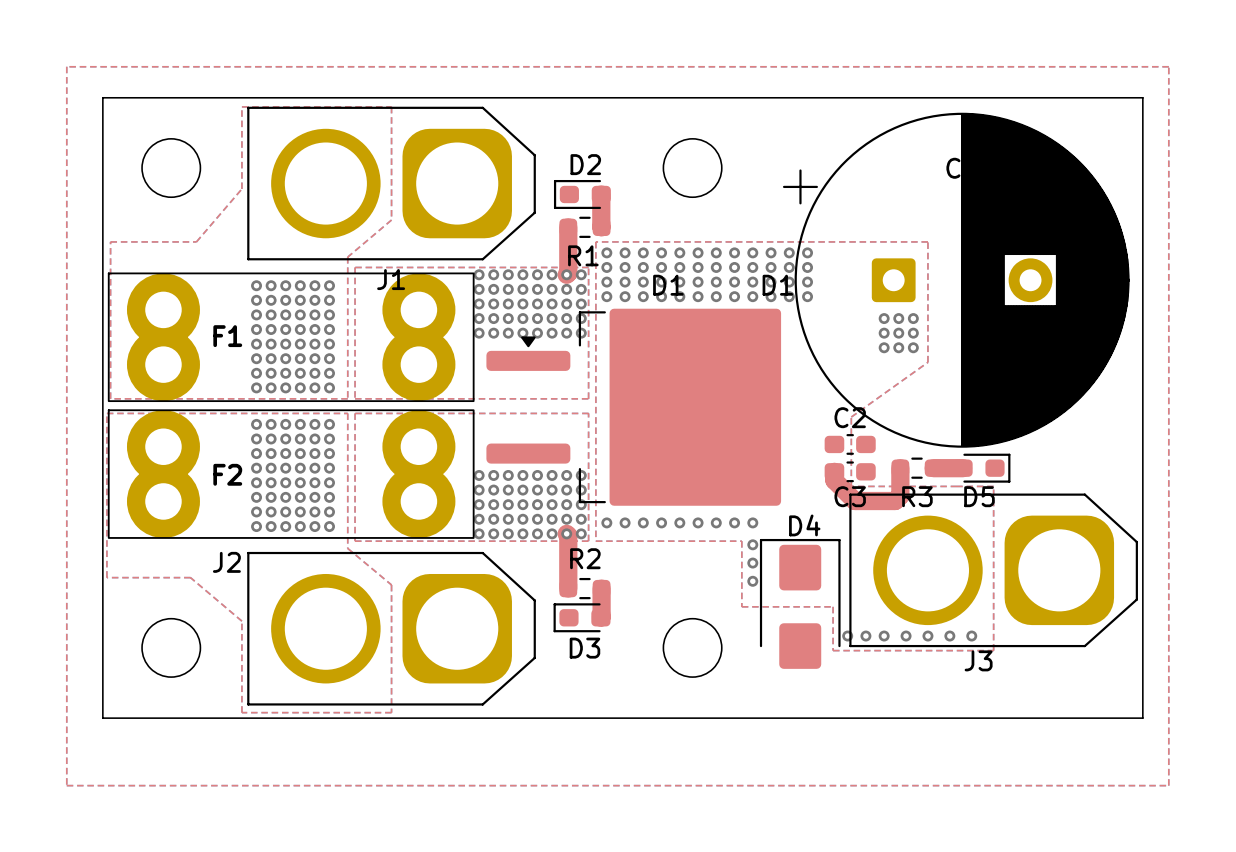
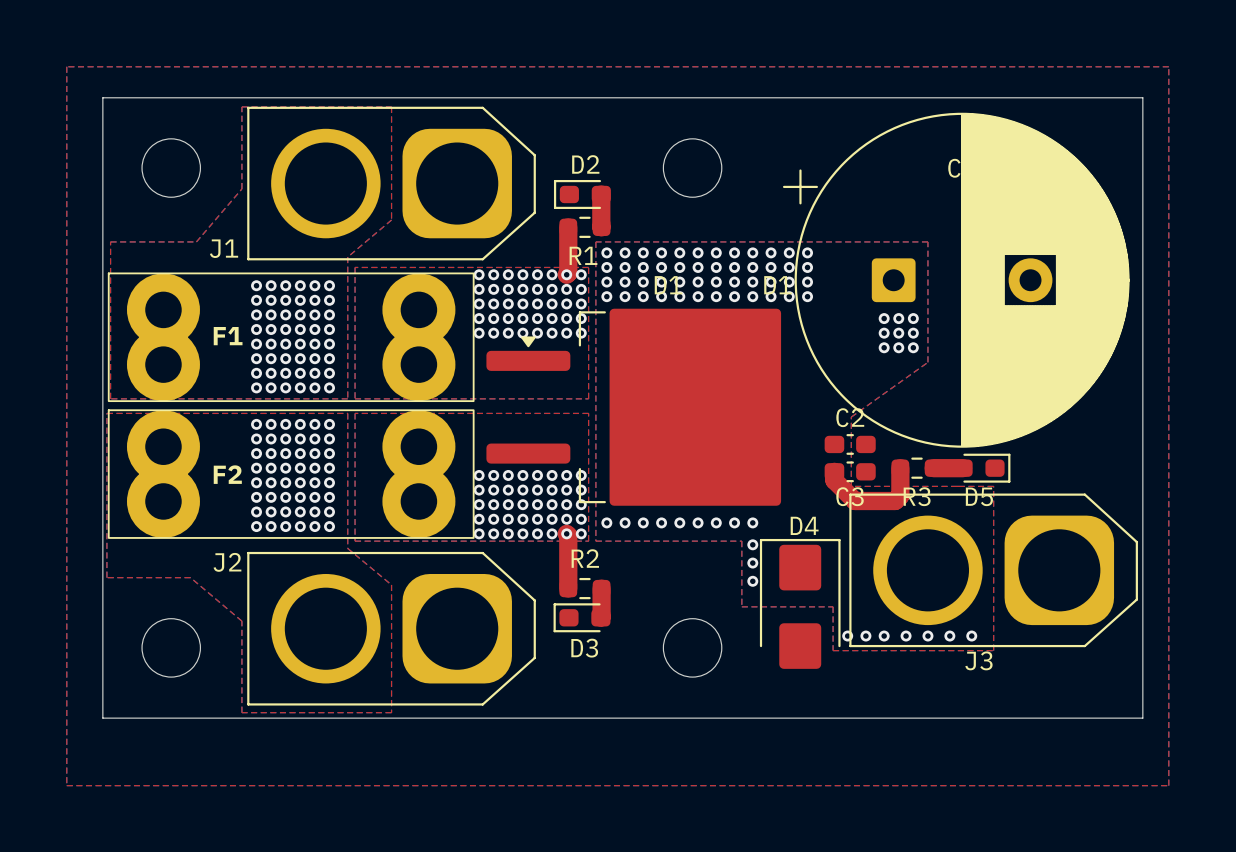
J1 name position: J1 (391, 279) -> J1 (224, 248)

